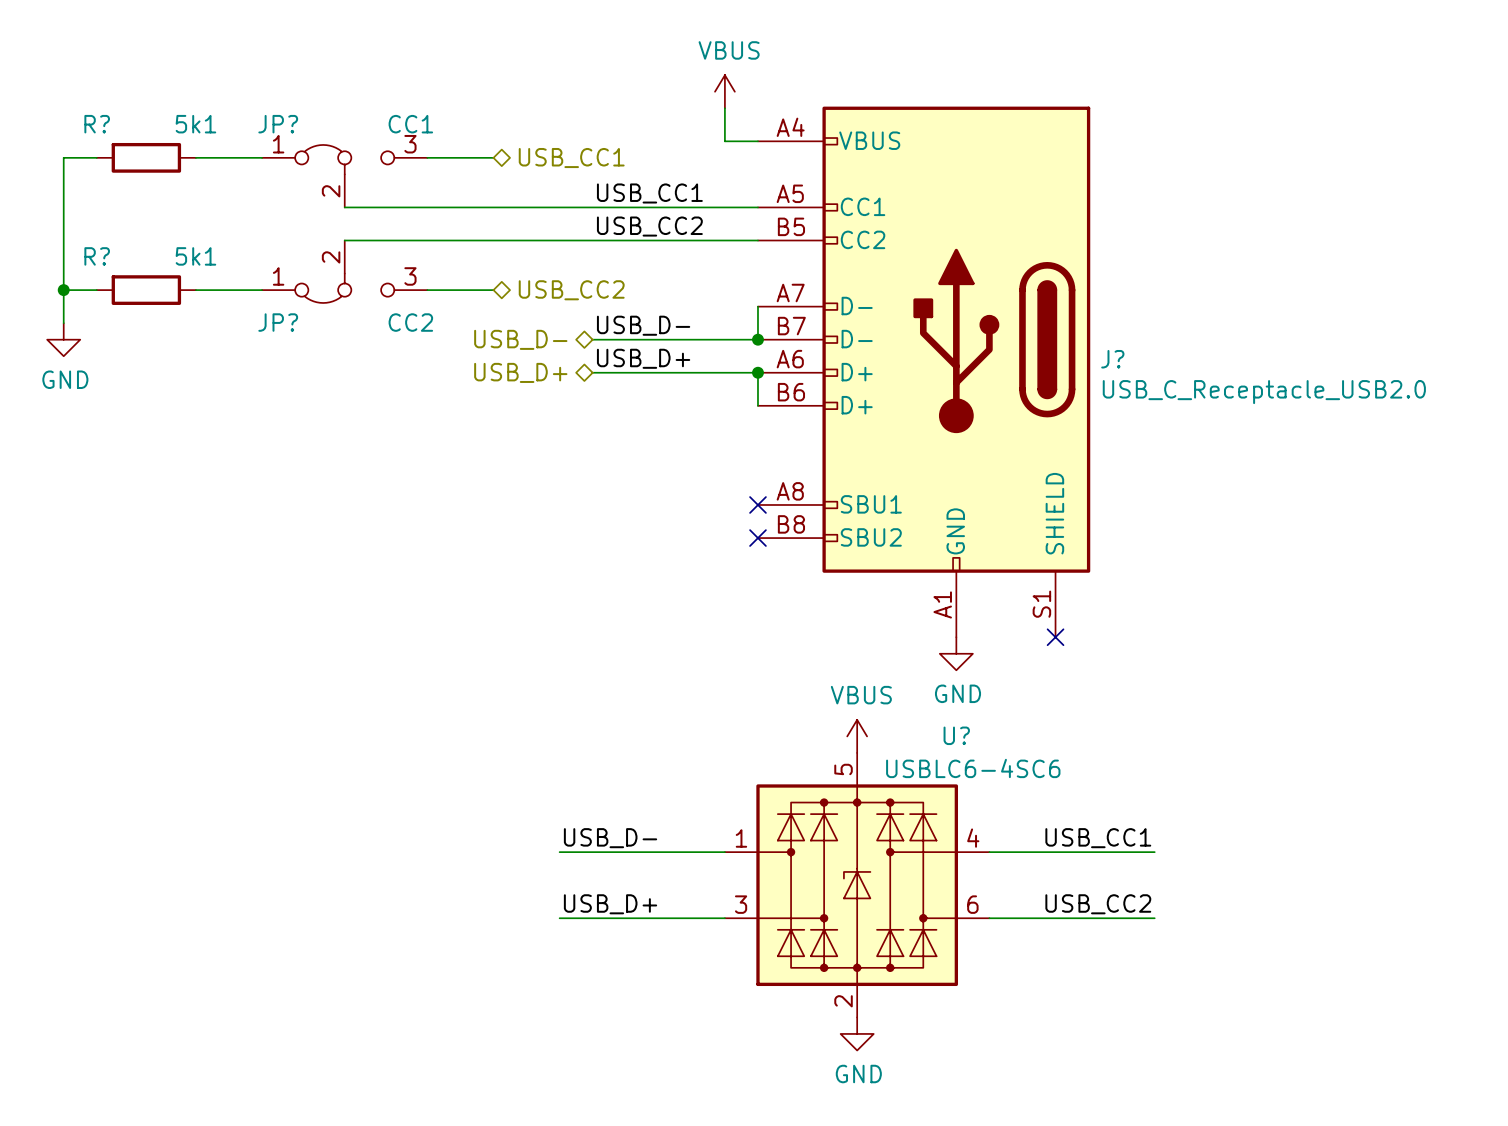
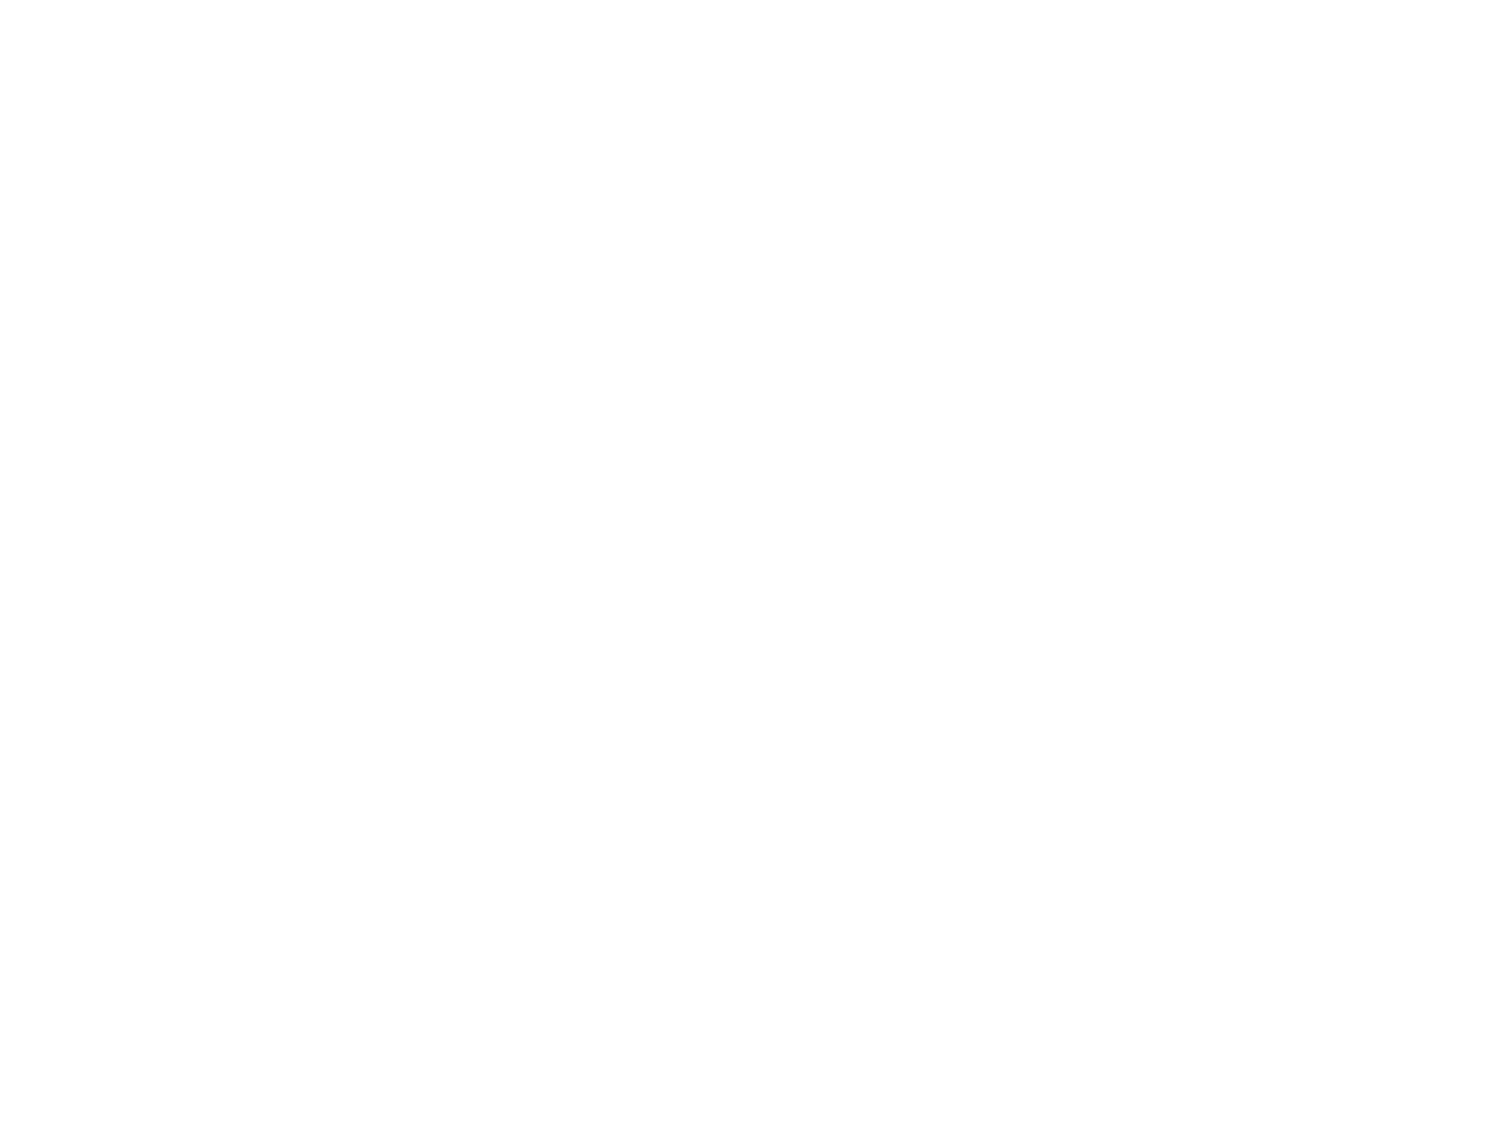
power symbol: VBUS (724, 91) -> none
wire: (724, 108) (724, 141) (757, 141) -> none
wire: (96, 157) (63, 157) (63, 323) -> none
R?: 5k1 (146, 157) -> none
wire: (195, 157) (262, 157) -> none
wire: (427, 157) (493, 157) -> none
hierarchical label: USB_CC1 (571, 158) -> none
JP?: CC1 (344, 176) -> none
label: USB_CC1 (649, 193) -> none
wire: (344, 207) (757, 207) -> none
label: USB_CC2 (649, 226) -> none
wire: (344, 240) (757, 240) -> none
JP?: CC2 (344, 271) -> none
wire: (63, 290) (96, 290) -> none
junction: (63, 290) -> none
R?: 5k1 (146, 290) -> none
wire: (195, 290) (262, 290) -> none
wire: (427, 290) (493, 290) -> none
hierarchical label: USB_CC2 (571, 290) -> none
wire: (757, 306) (757, 339) (592, 339) -> none
label: USB_D- (643, 325) -> none
power symbol: GND (63, 339) -> none
hierarchical label: USB_D- (520, 339) -> none
junction: (757, 339) -> none
label: USB_D+ (643, 358) -> none
J?: USB_C_Receptacle_USB2.0 (924, 371) -> none
hierarchical label: USB_D+ (520, 372) -> none
wire: (592, 372) (757, 372) (757, 405) -> none
junction: (757, 372) -> none
no-connect mark: (757, 504) -> none
no-connect mark: (757, 538) -> none
no-connect mark: (1055, 637) -> none
power symbol: GND (956, 653) -> none
power symbol: VBUS (857, 736) -> none
label: USB_D- (610, 838) -> none
label: USB_CC1 (1098, 838) -> none
wire: (559, 852) (724, 852) -> none
wire: (989, 852) (1154, 852) -> none
U?: USBLC6-4SC6 (857, 885) -> none
label: USB_D+ (610, 904) -> none
label: USB_CC2 (1098, 904) -> none
wire: (559, 918) (724, 918) -> none
wire: (989, 918) (1154, 918) -> none
power symbol: GND (857, 1033) -> none

